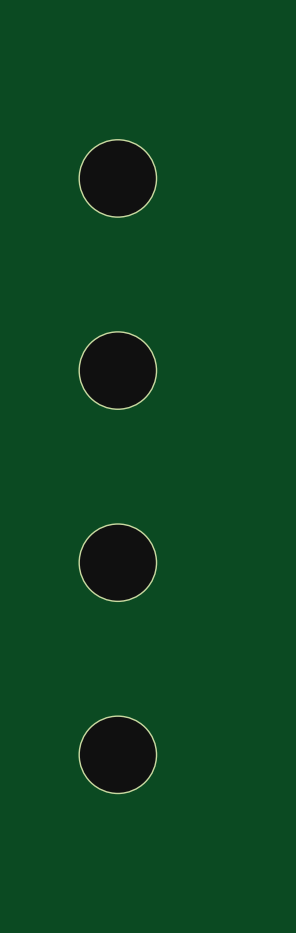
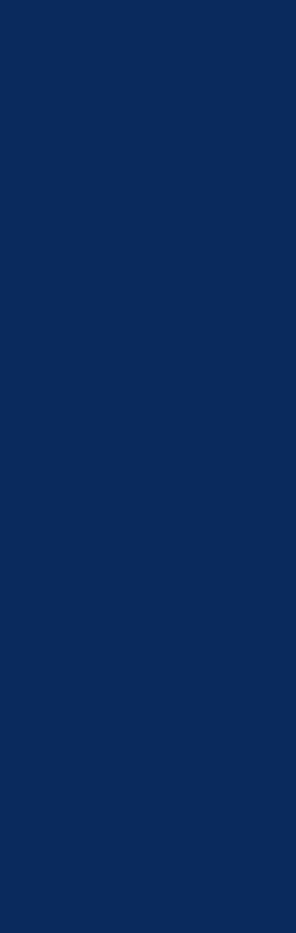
part: (117, 178) -> none
part: (117, 370) -> none
part: (117, 562) -> none
part: (117, 754) -> none

